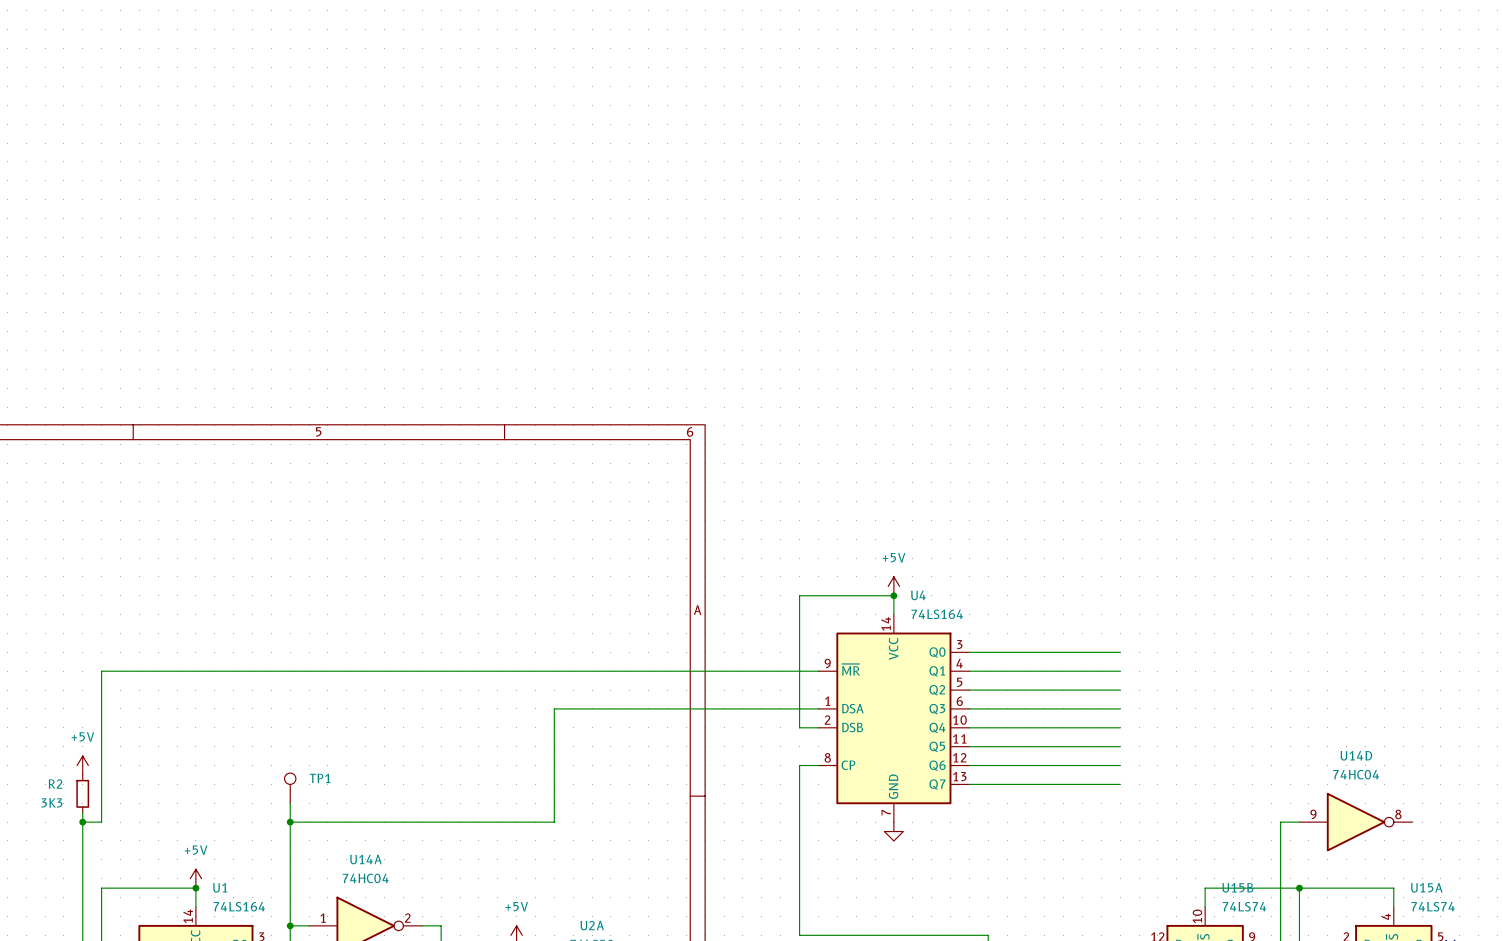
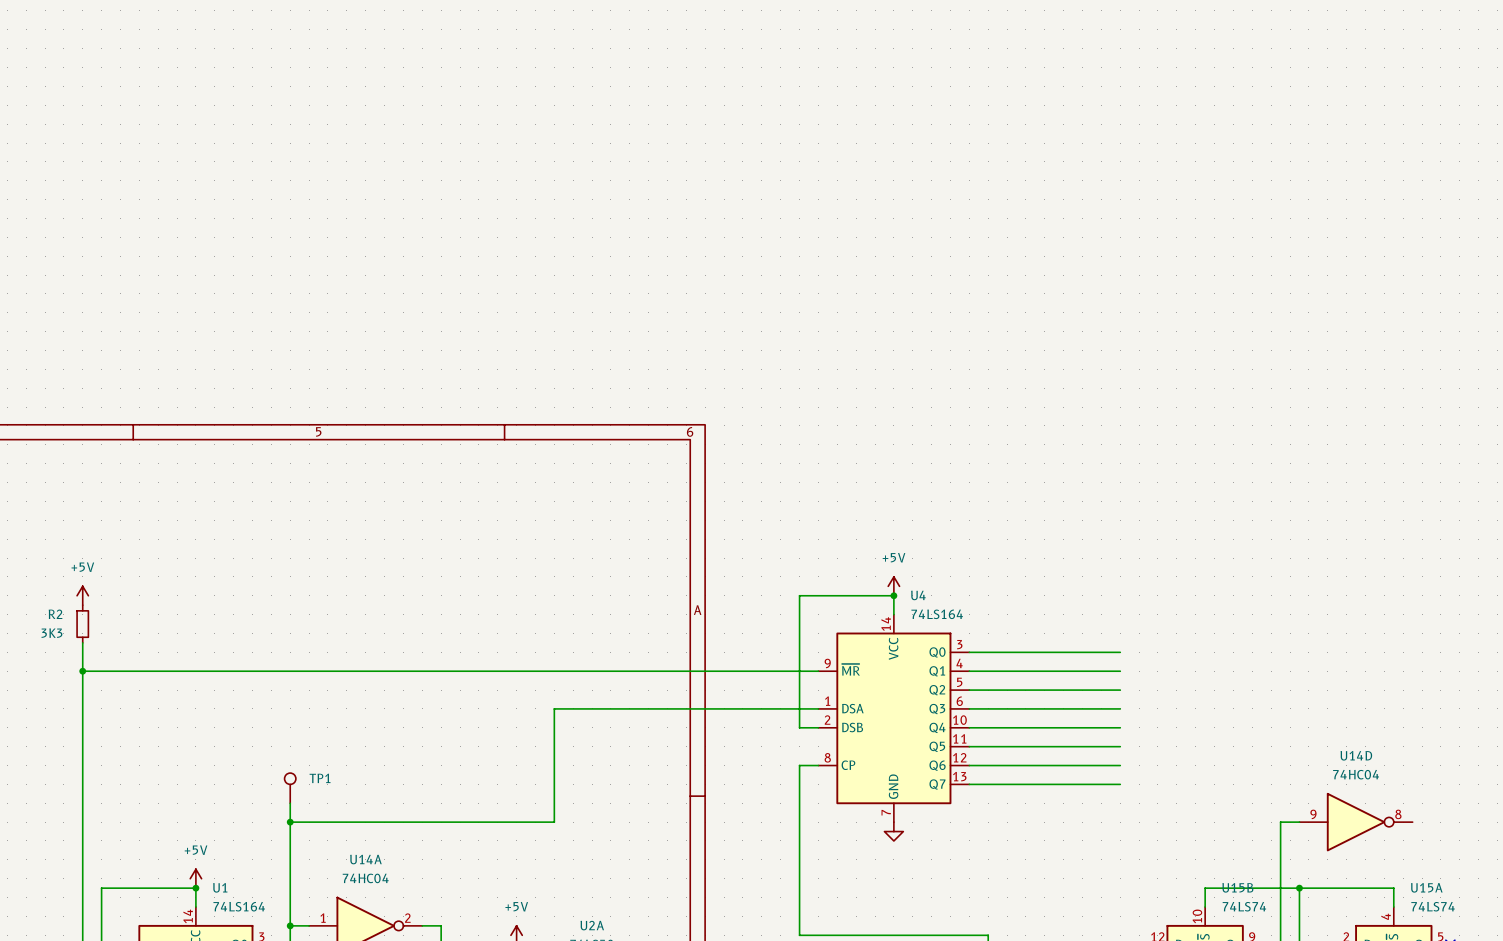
wire: none -> (82, 642) (82, 812)
junction: none -> (82, 671)
wire: (101, 671) (101, 822) (82, 822) -> (101, 671) (82, 671)
power symbol position: +5V (82, 765) -> +5V (82, 595)
R2 position: (82, 793) -> (82, 624)
junction: (82, 822) -> none

